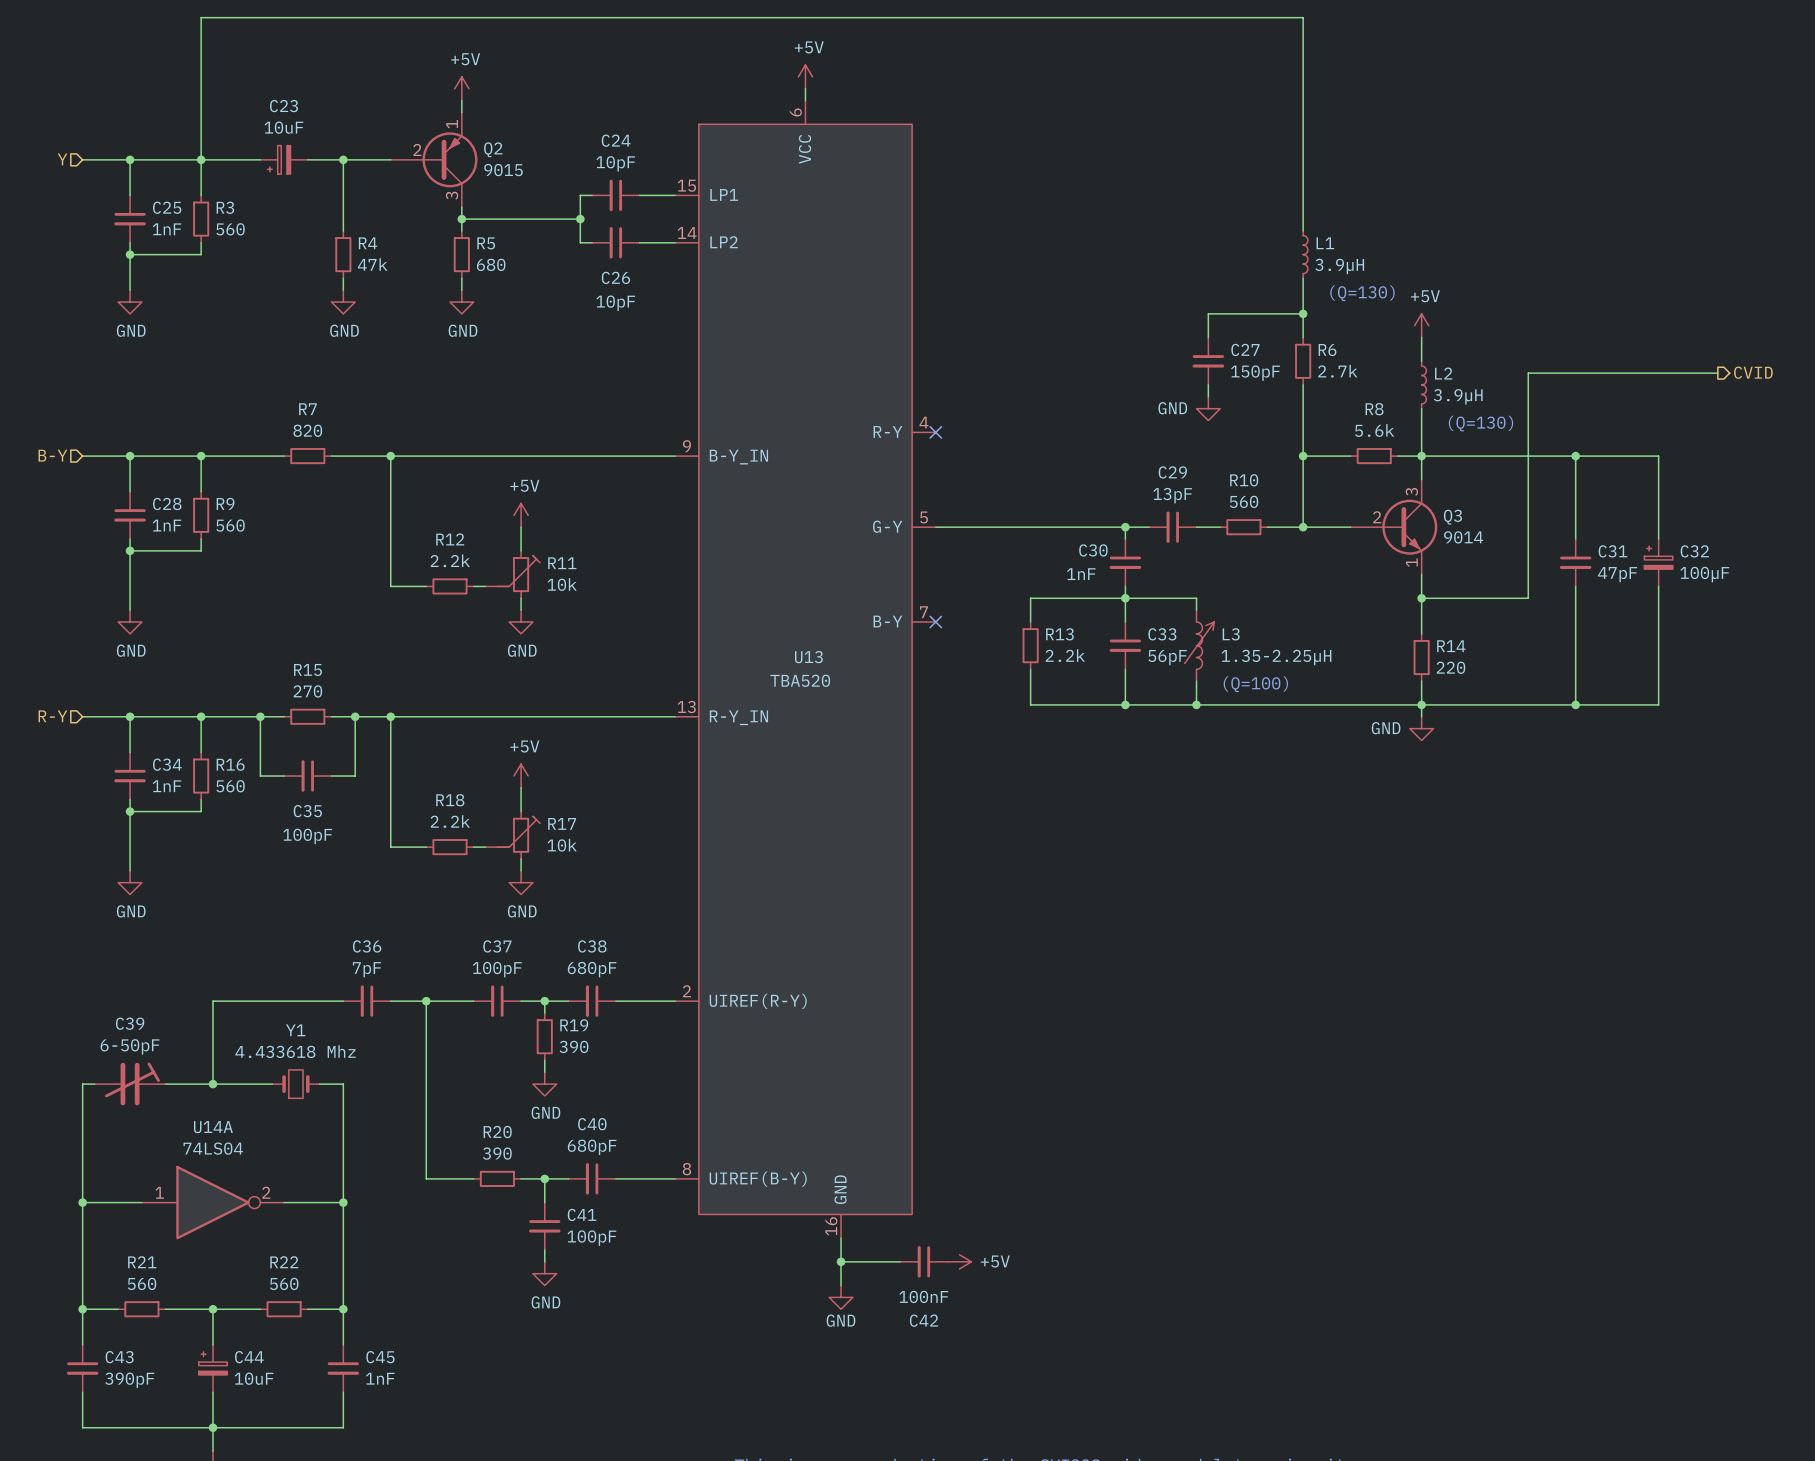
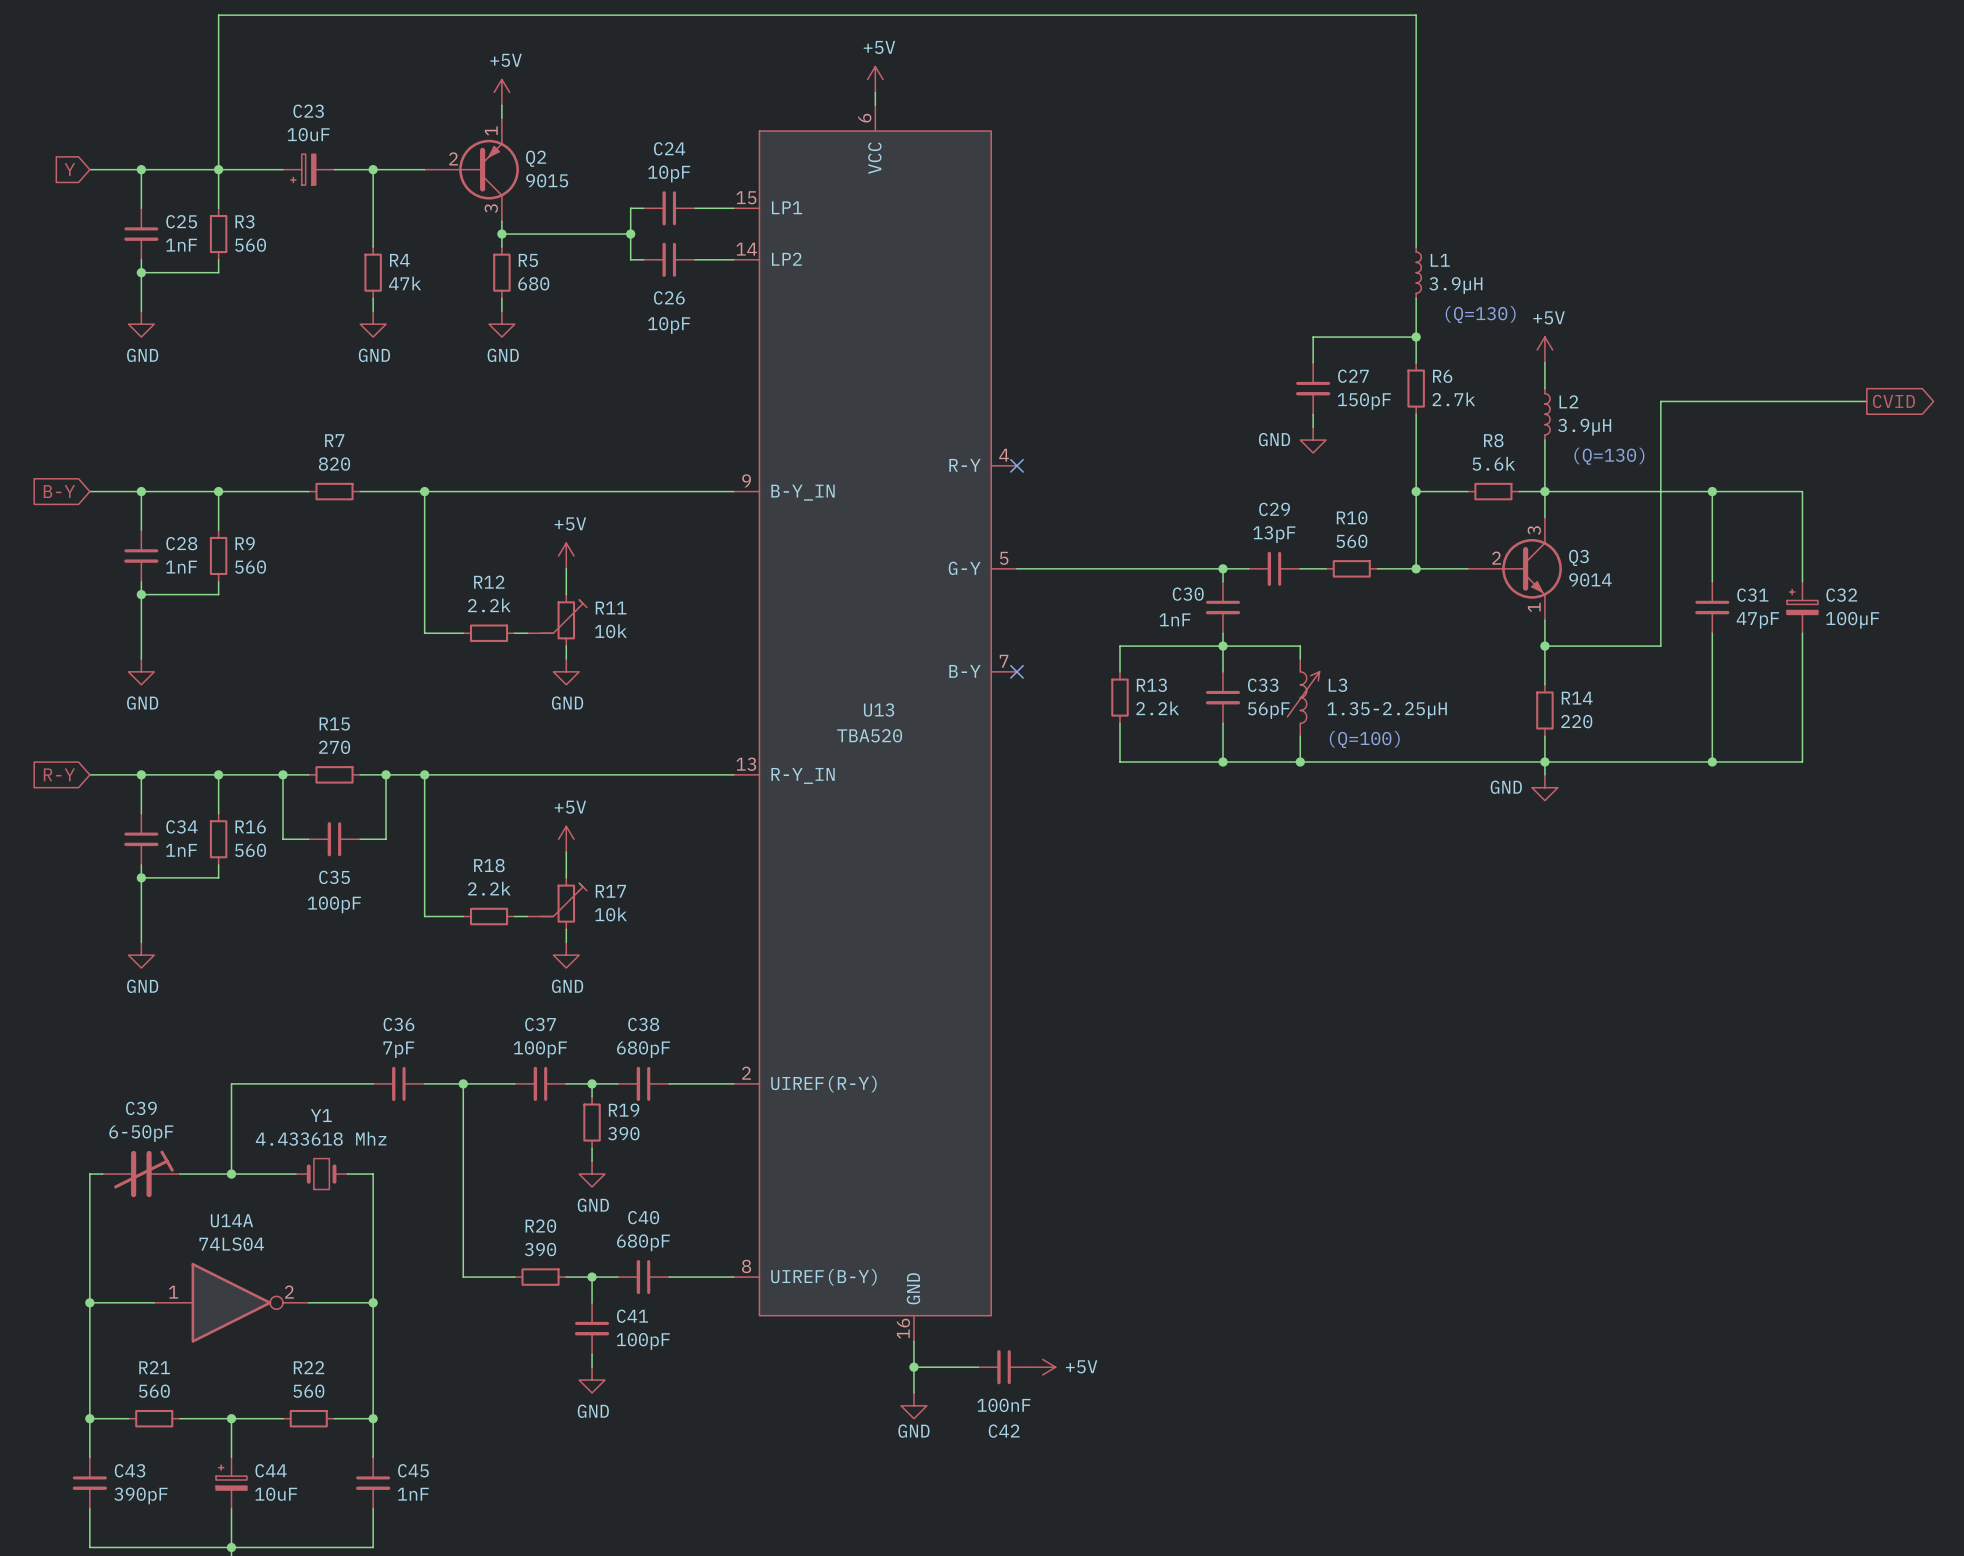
hierarchical label: Y (62, 159) -> none
global label: none -> Y (69, 169)
hierarchical label: CVID (1753, 372) -> none
global label: none -> CVID (1893, 401)
hierarchical label: B-Y (52, 455) -> none
global label: none -> B-Y (59, 491)
hierarchical label: R-Y (52, 716) -> none
global label: none -> R-Y (59, 774)

